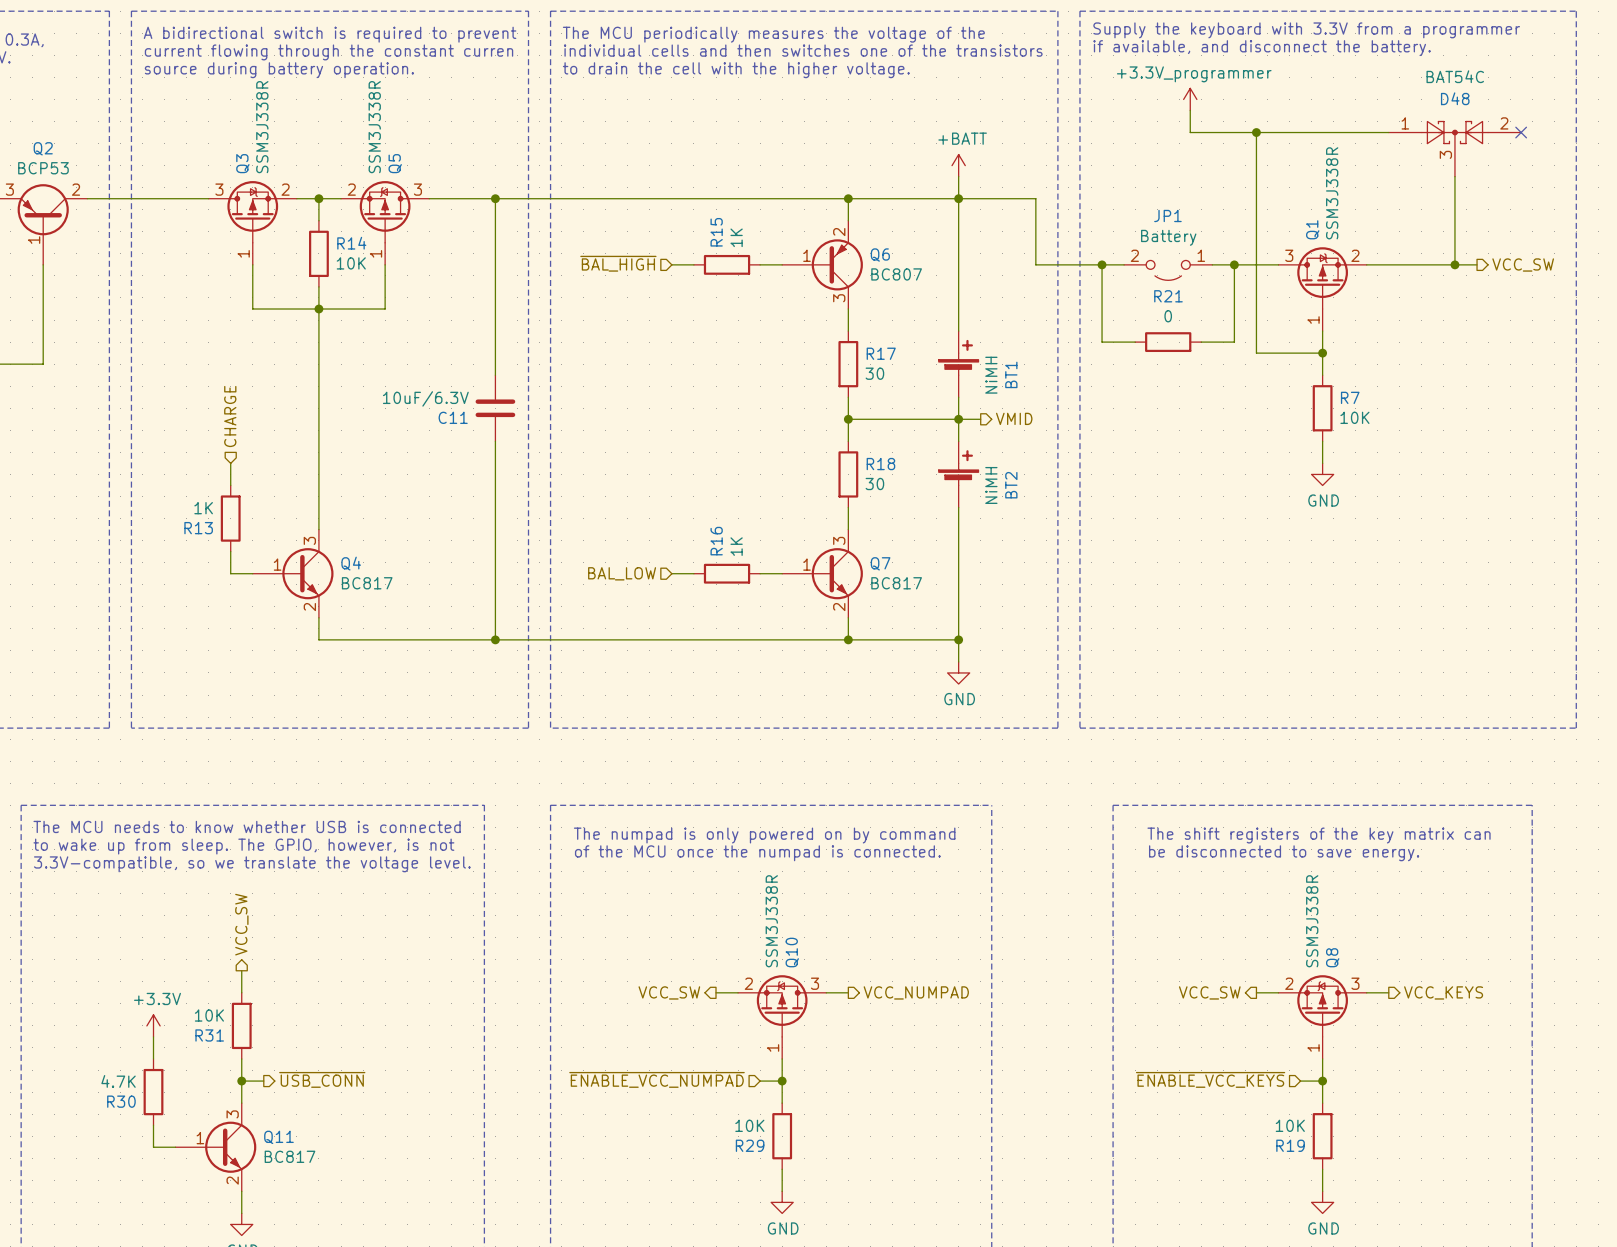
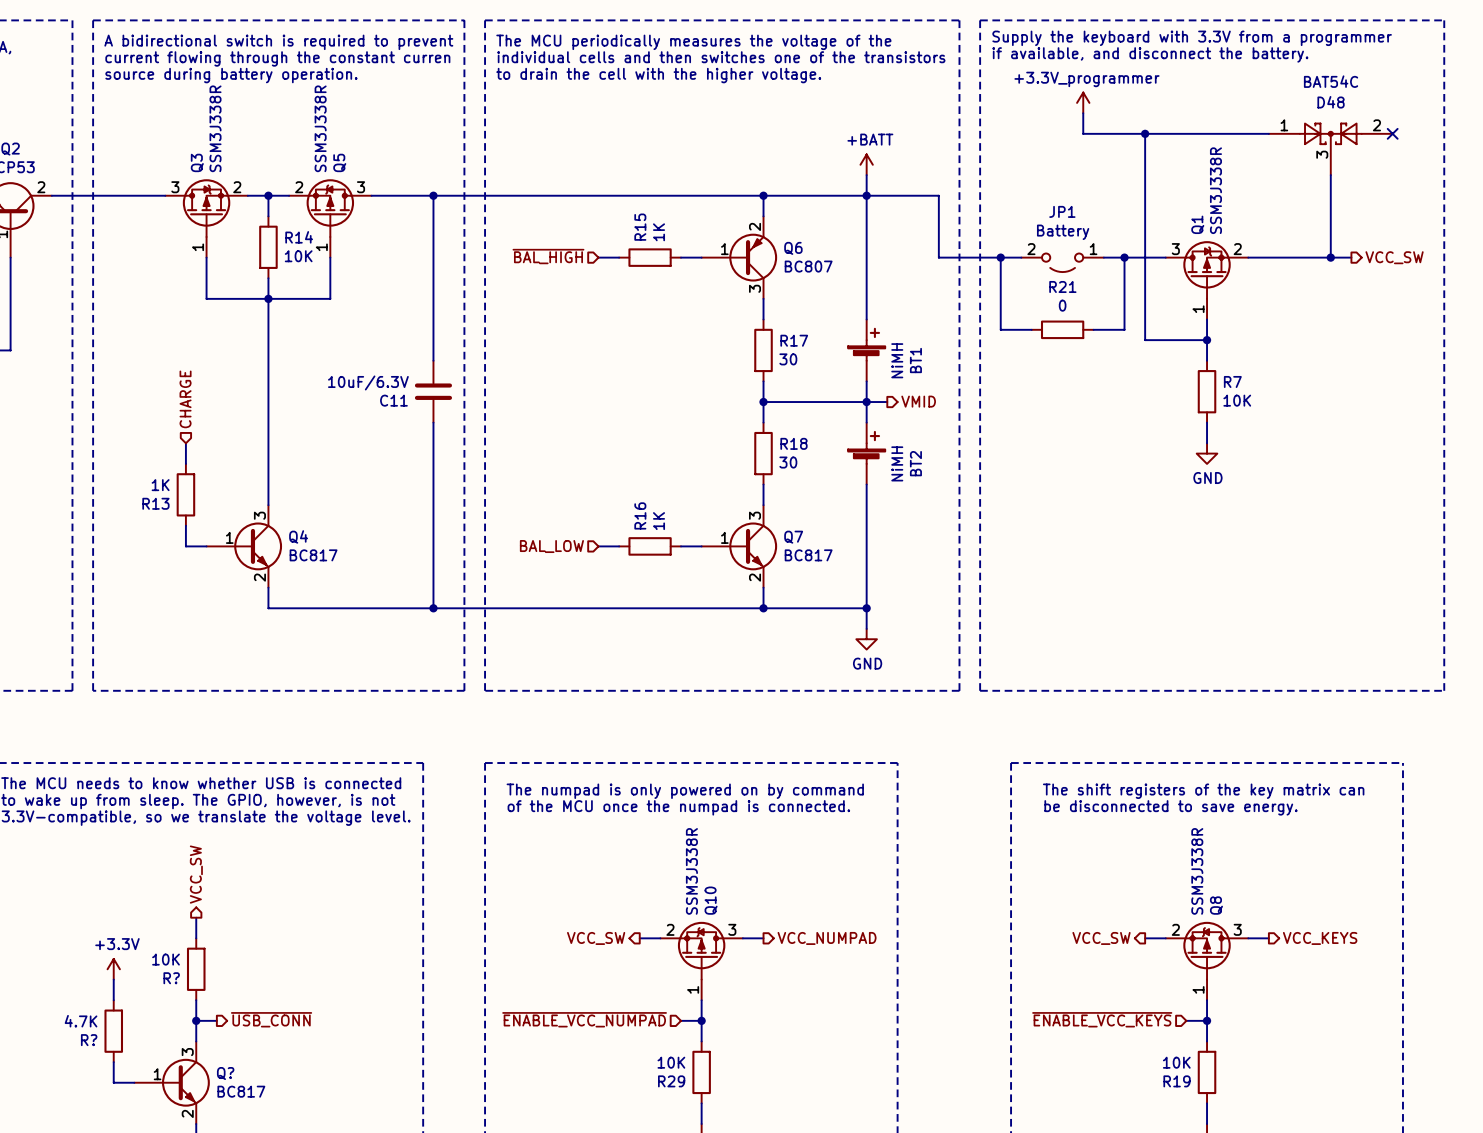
R31 name: R31 (209, 1035) -> R? (171, 978)
R30 name: R30 (121, 1101) -> R? (89, 1040)
Q11 name: Q11 (278, 1137) -> Q? (225, 1073)

